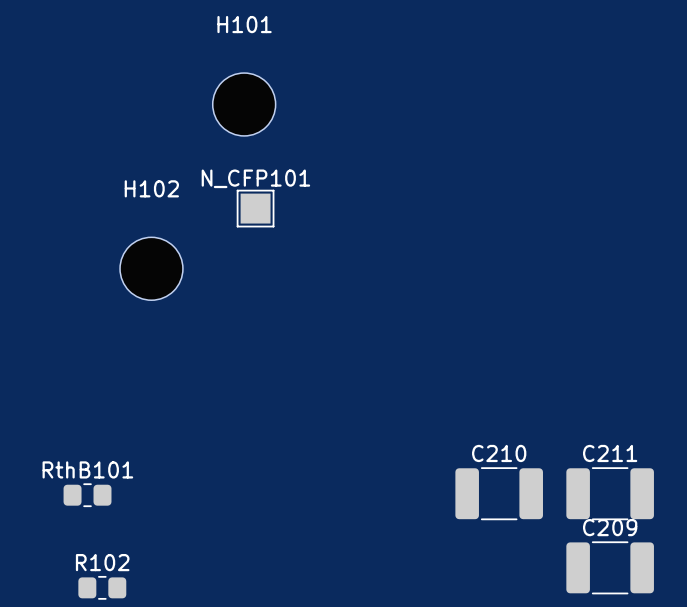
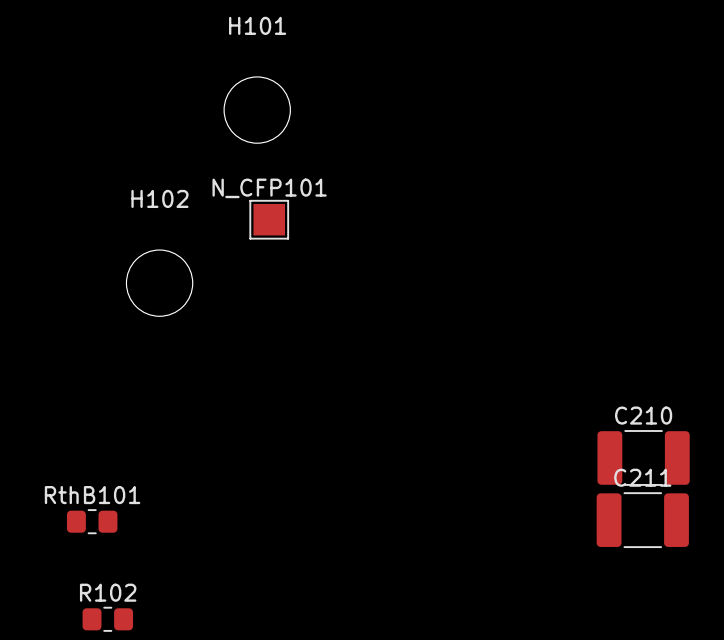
C210 position: (499, 493) -> (643, 457)
C209: (610, 567) -> none

